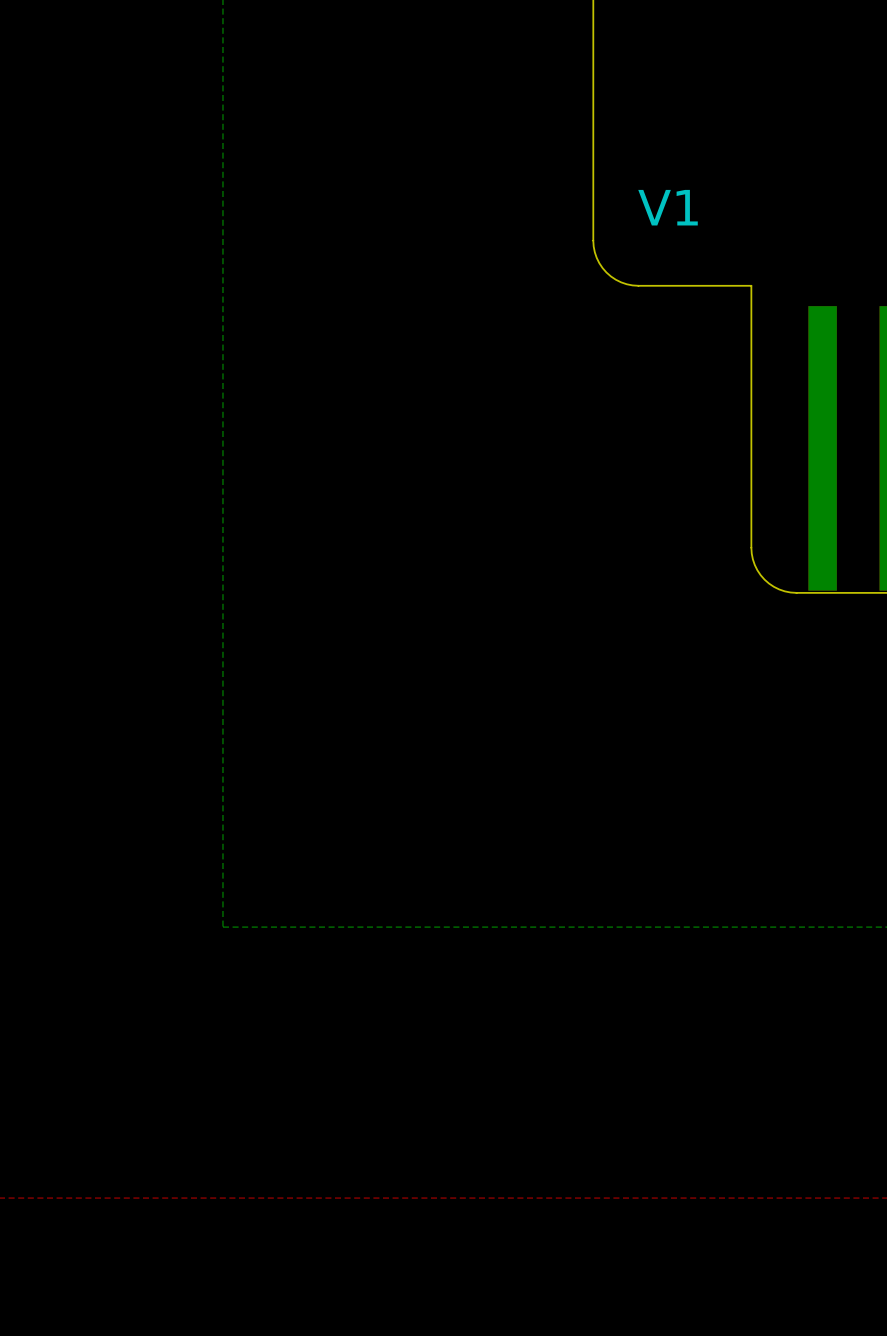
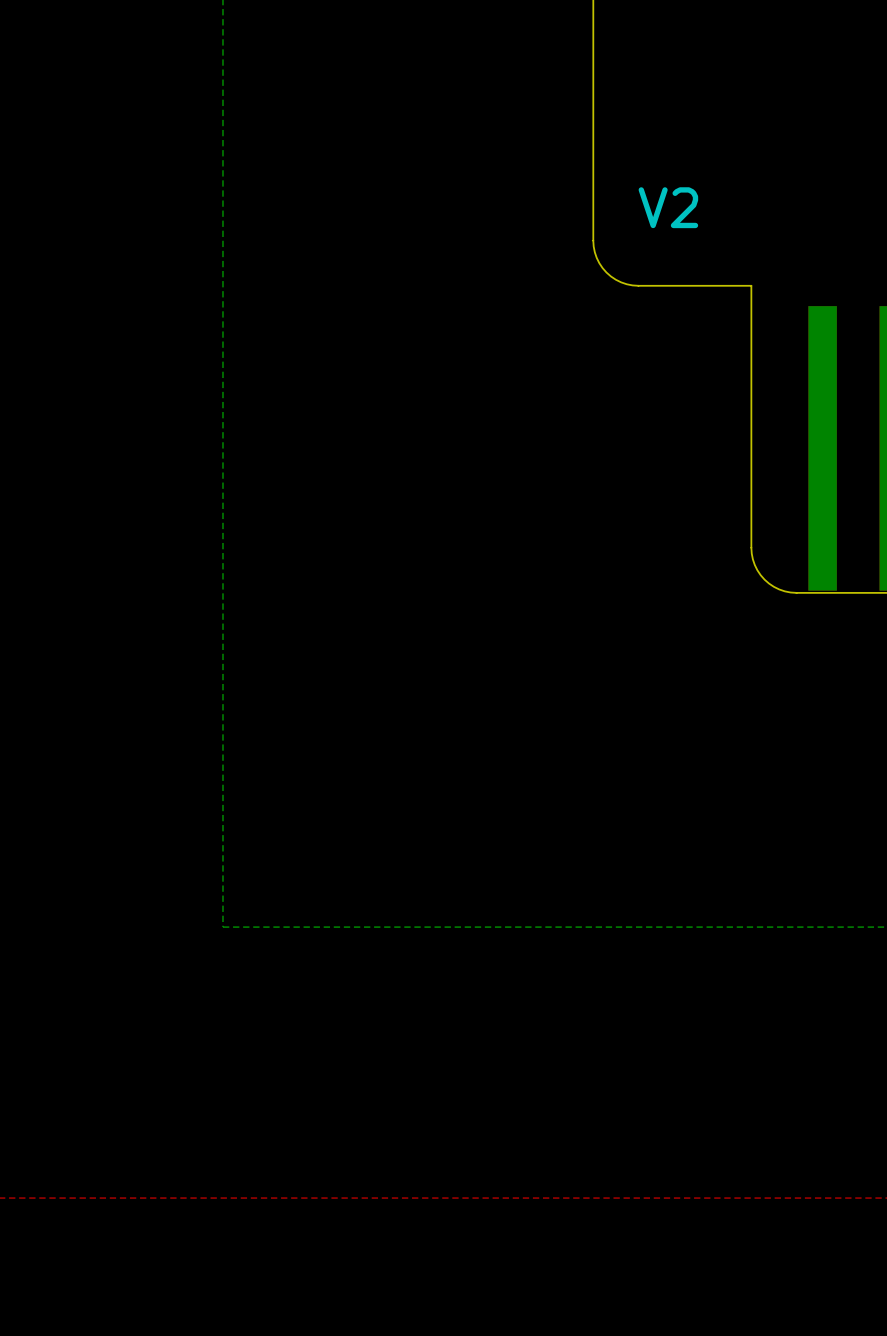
text: V1 (668, 207) -> V2 (668, 207)

